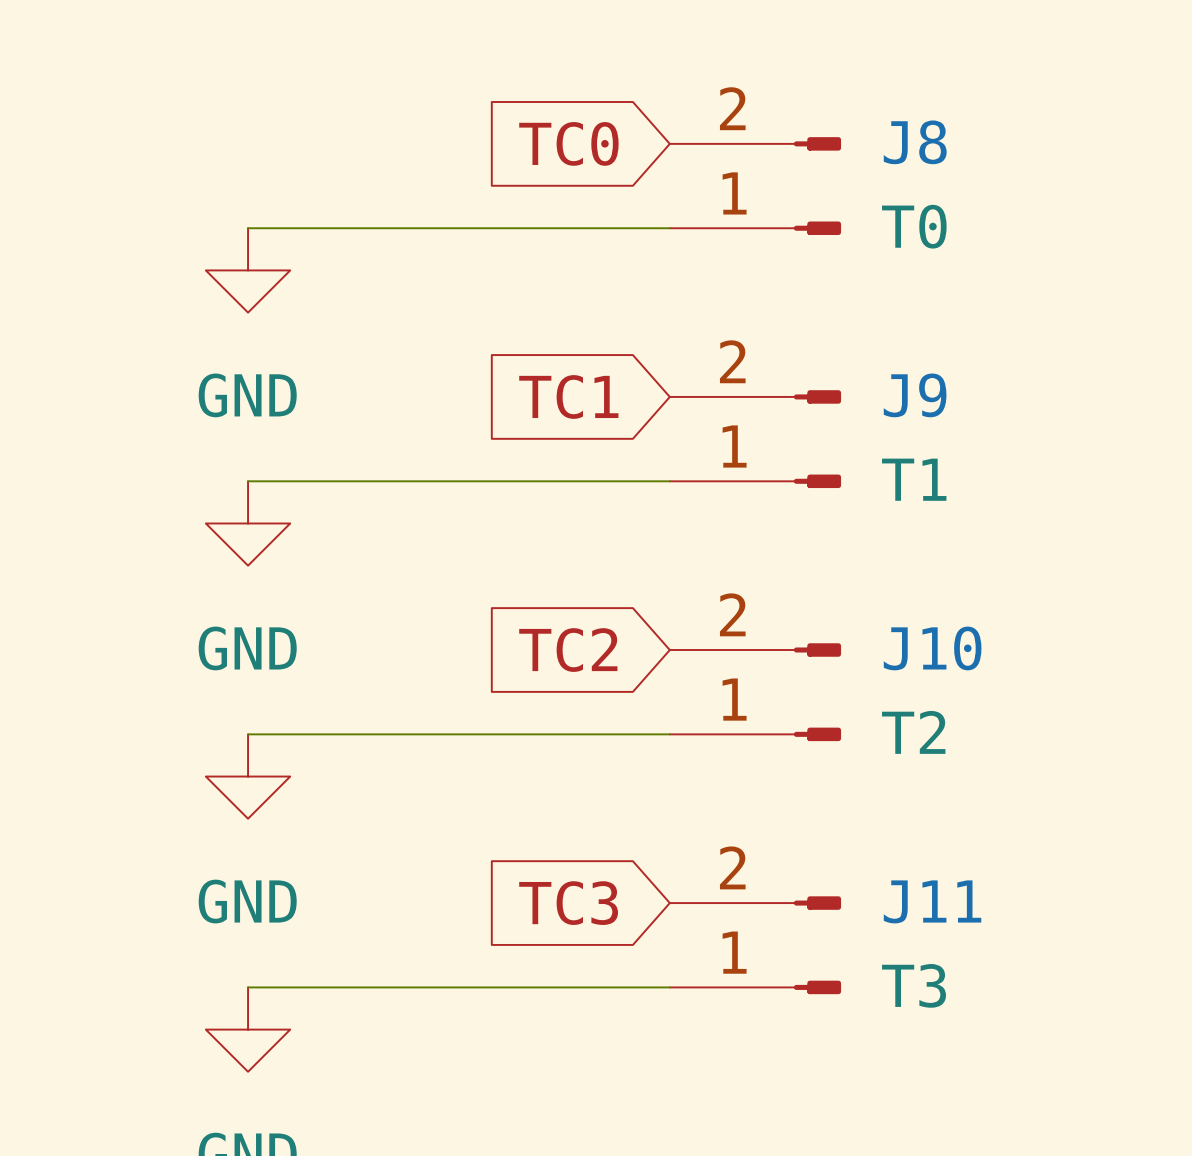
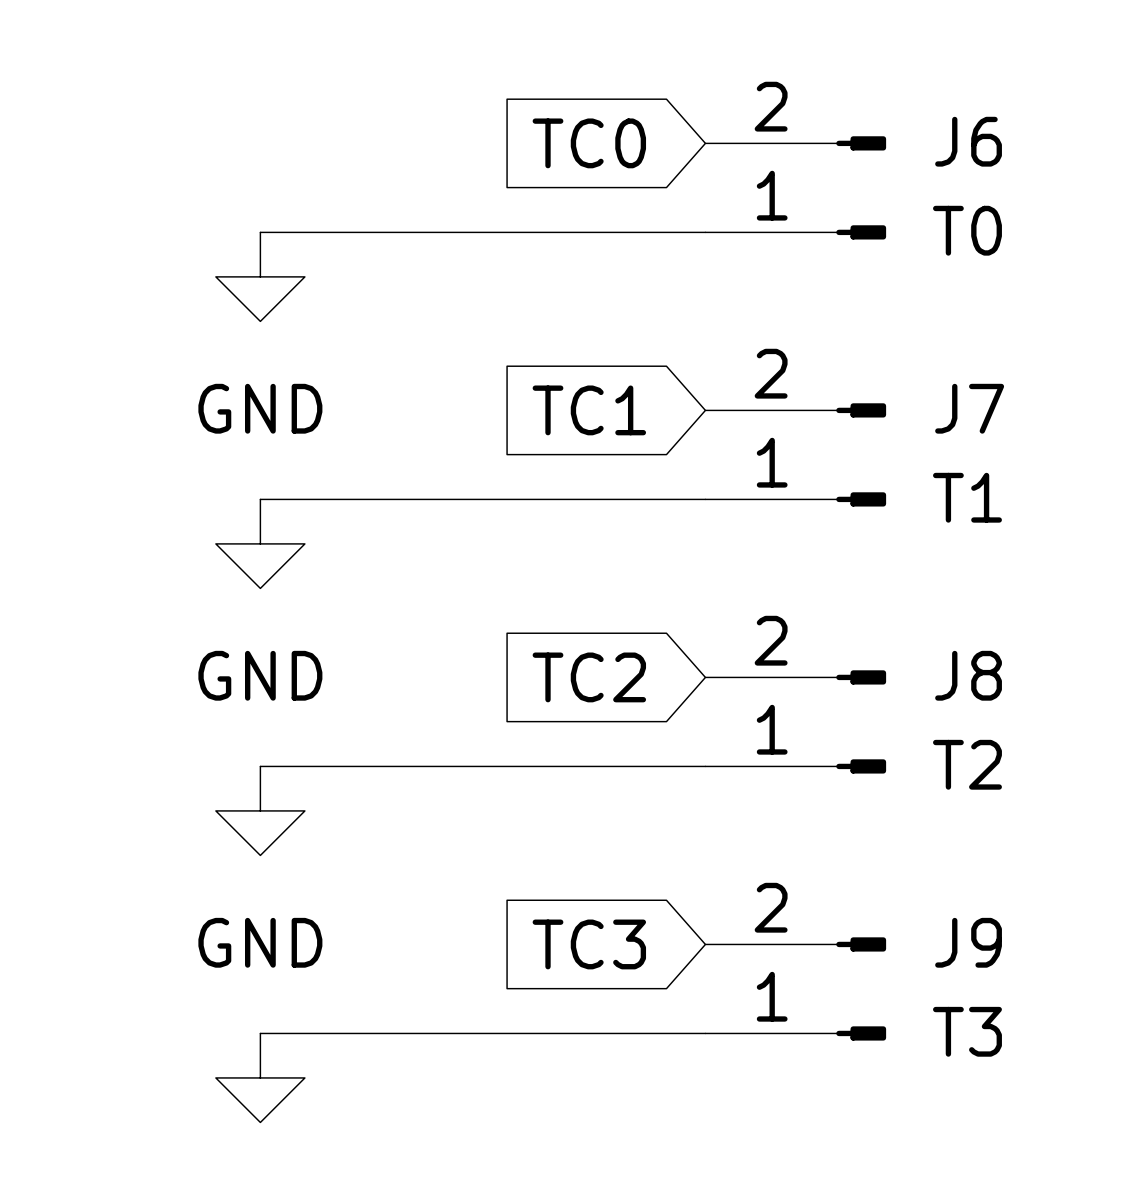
J8 name: J8 (915, 142) -> J6 (968, 141)
J9 name: J9 (915, 395) -> J7 (969, 408)
J10 name: J10 (932, 648) -> J8 (968, 675)
J11 name: J11 (932, 901) -> J9 (968, 942)

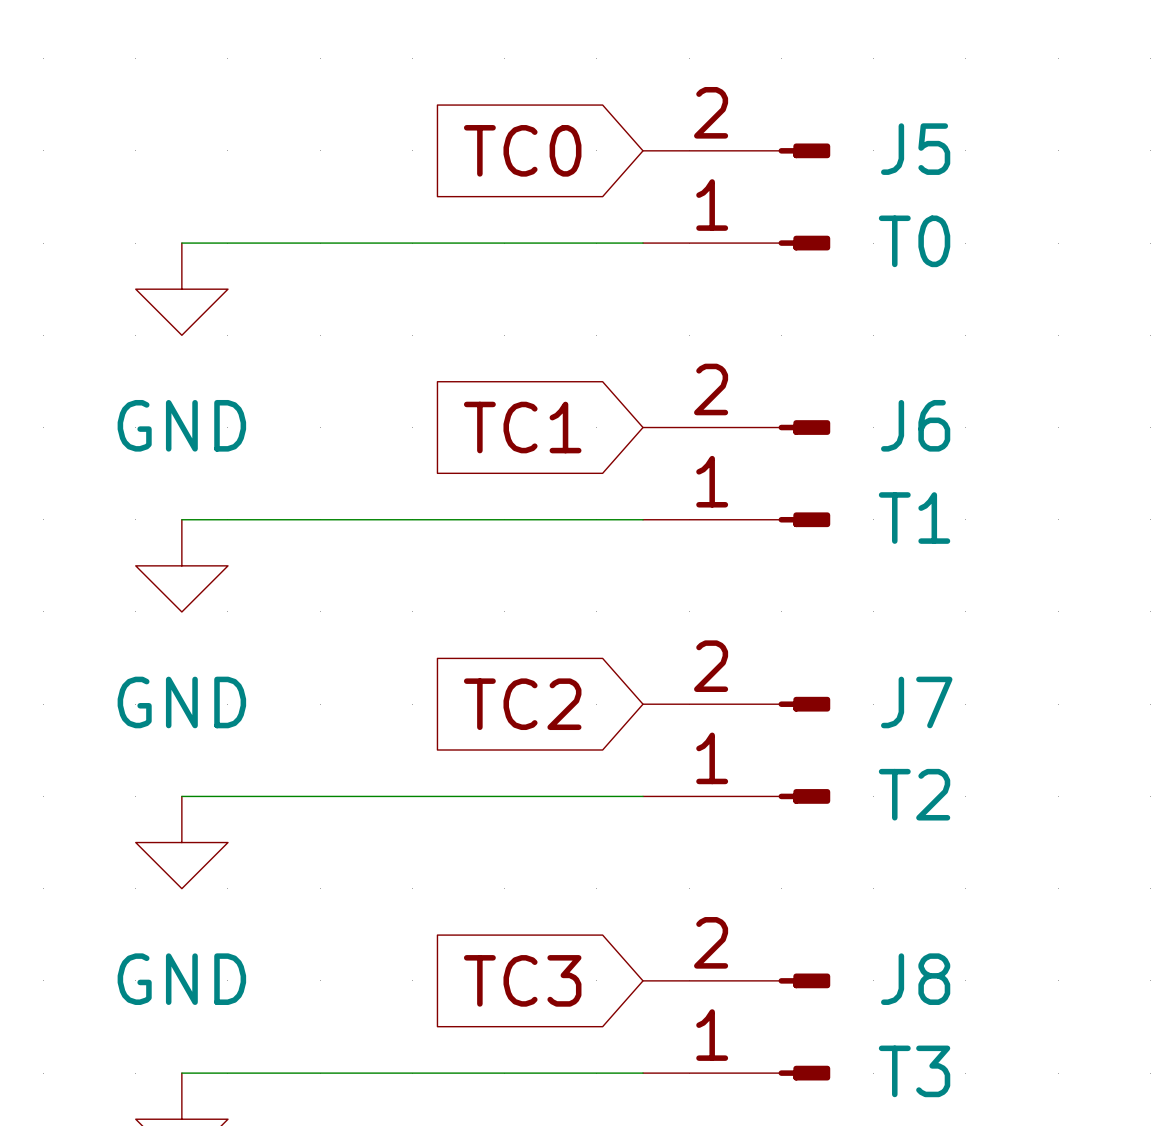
J6 name: J6 (968, 141) -> J5 (915, 149)
J7 name: J7 (969, 408) -> J6 (915, 425)
J8 name: J8 (968, 675) -> J7 (916, 702)
J9 name: J9 (968, 942) -> J8 (915, 979)

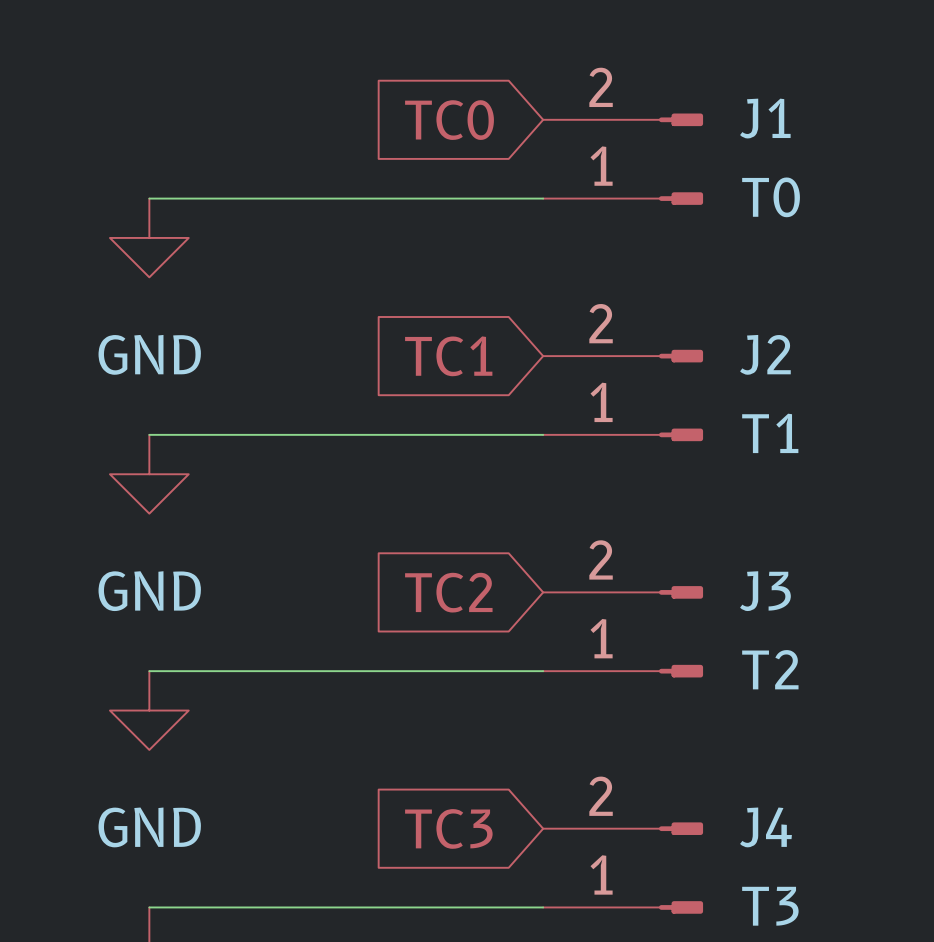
J5 name: J5 (915, 149) -> J1 (765, 118)
J6 name: J6 (915, 425) -> J2 (765, 354)
J7 name: J7 (916, 702) -> J3 (765, 591)
J8 name: J8 (915, 979) -> J4 (765, 827)

